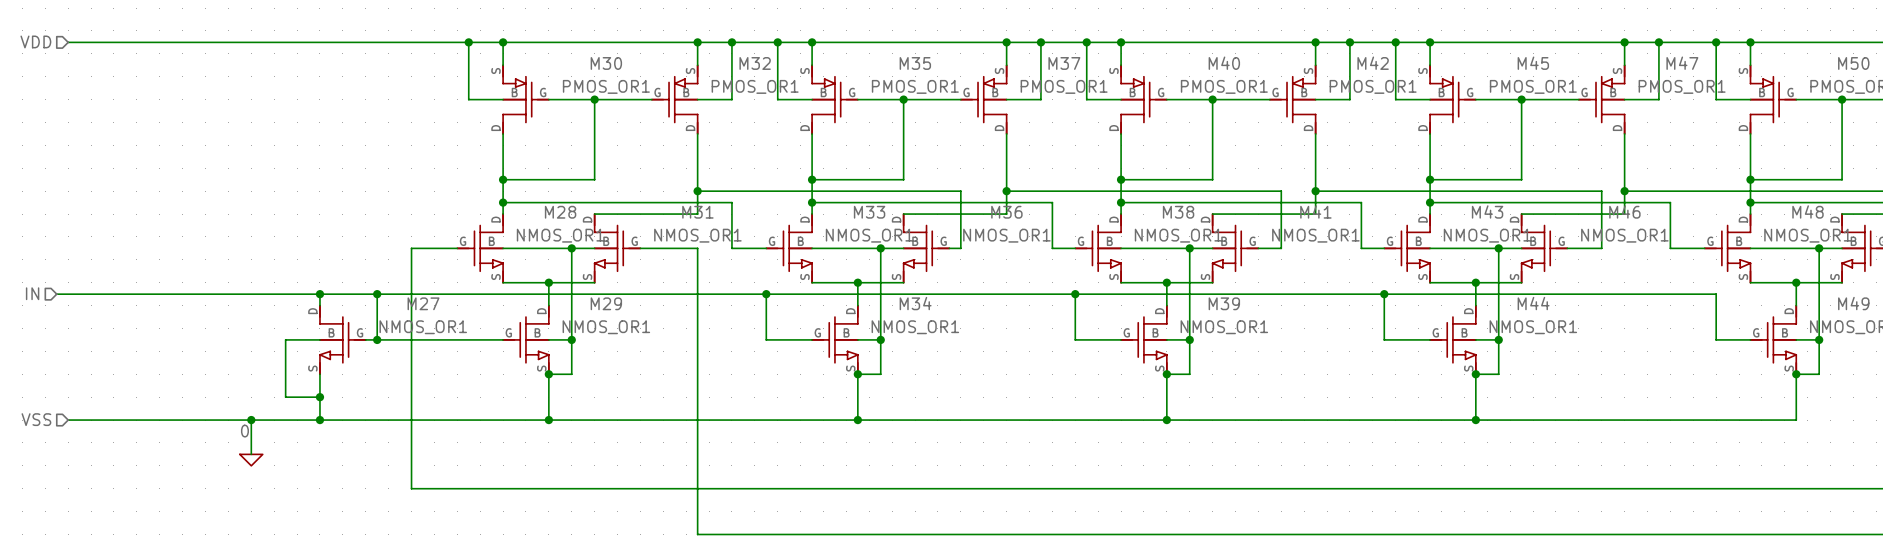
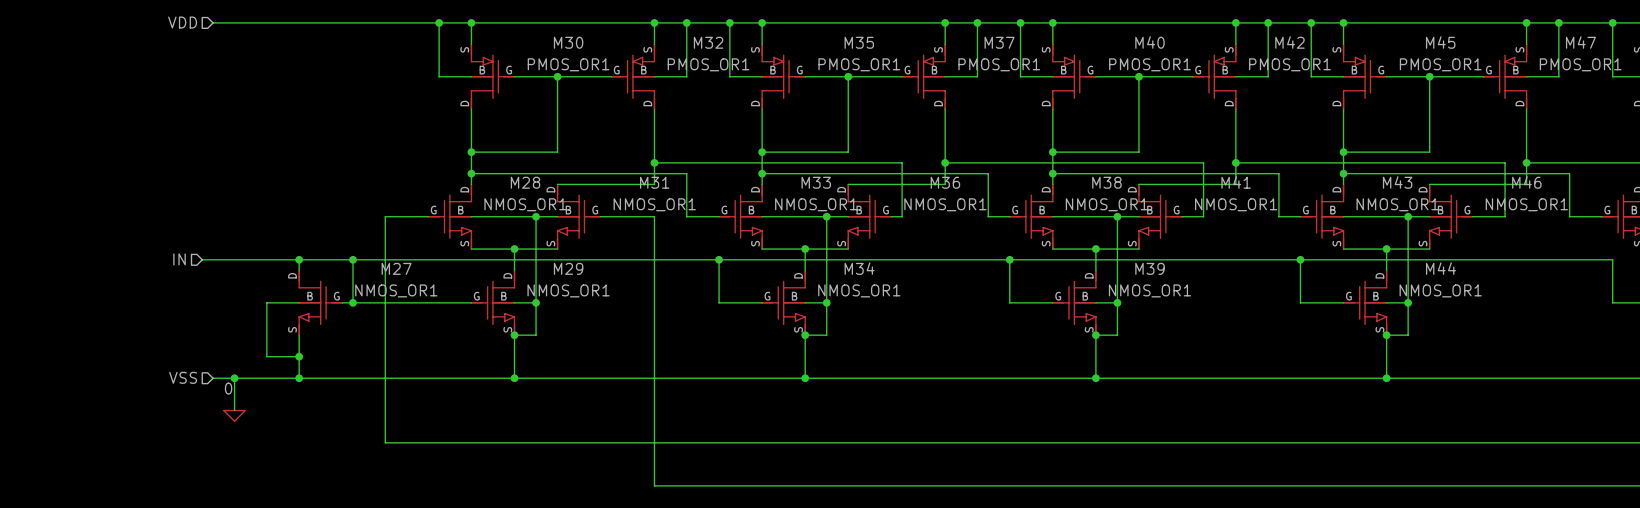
hierarchical label position: VDD (35, 41) -> VDD (182, 22)
wire: (68, 42) (228, 42) -> none
hierarchical label position: IN (32, 293) -> IN (179, 259)
wire: (56, 294) (216, 294) -> none
hierarchical label position: VSS (36, 419) -> VSS (183, 377)
wire: (68, 420) (228, 420) -> none

